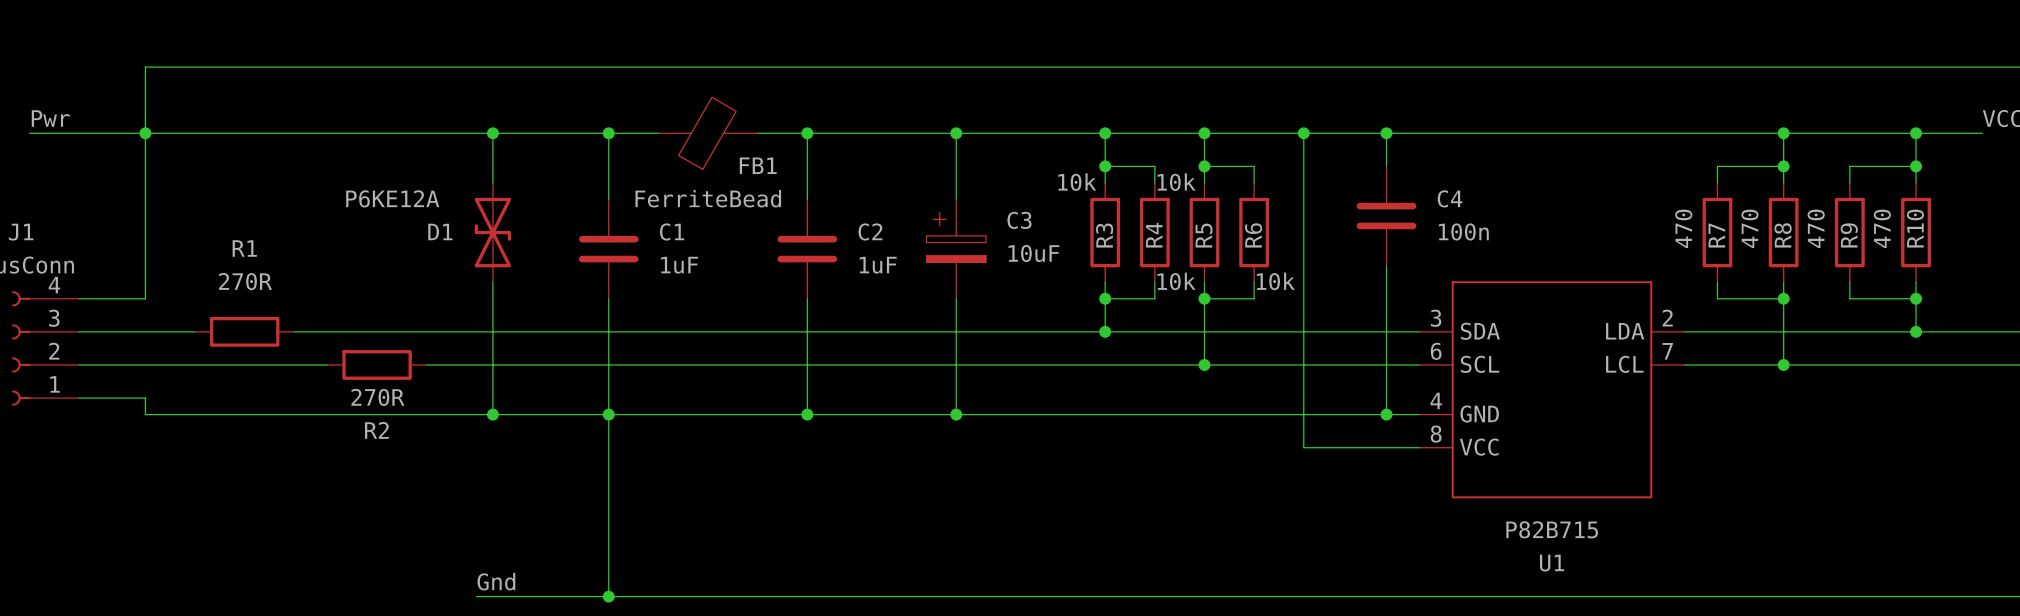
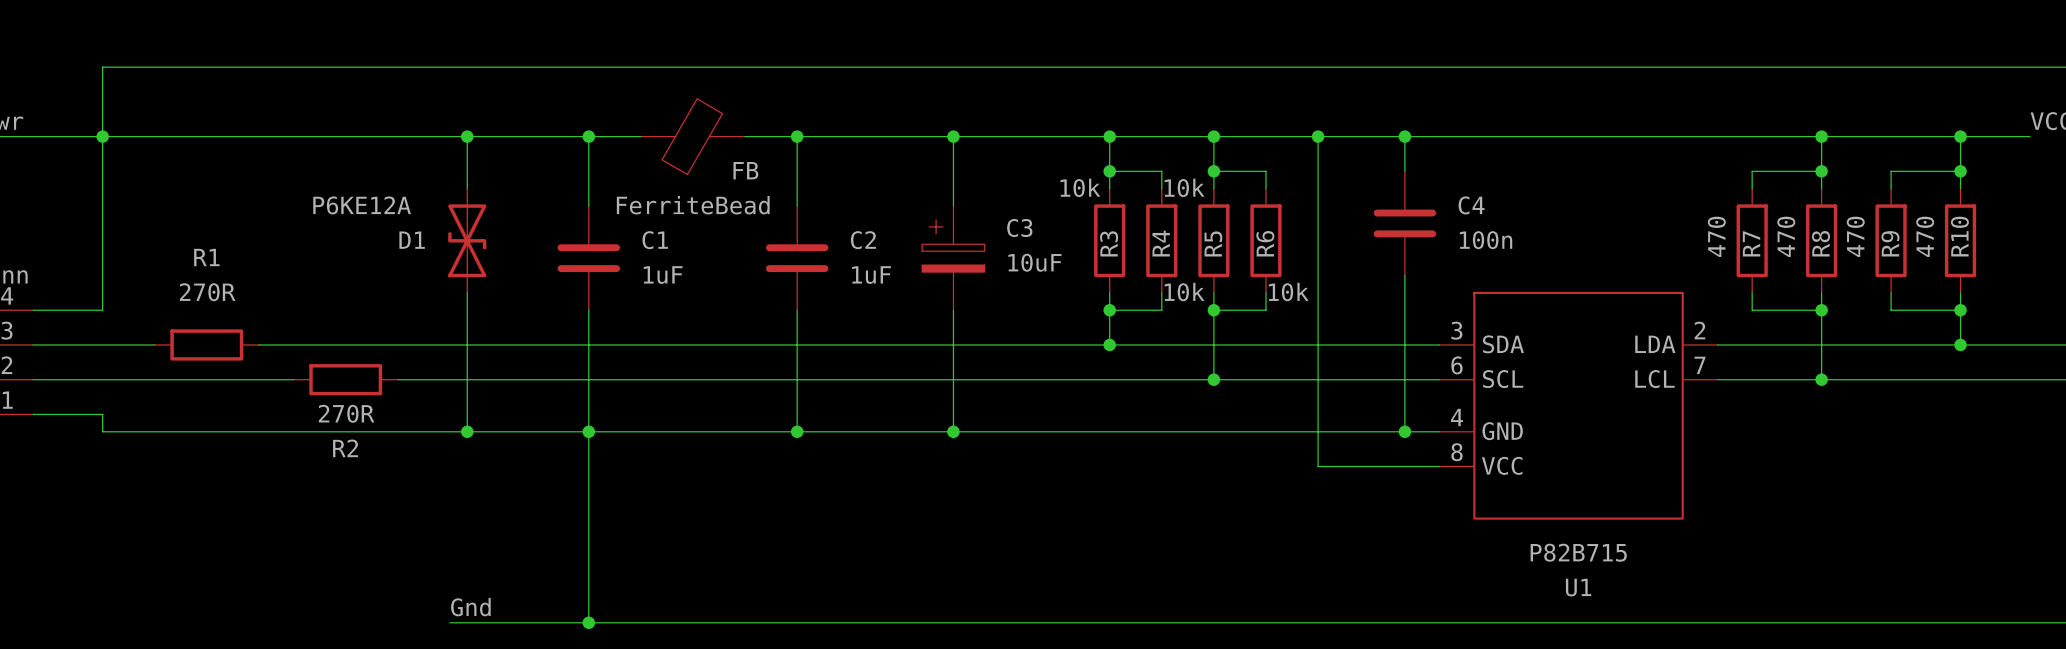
FB1 name: FB1 (758, 165) -> FB (745, 170)

